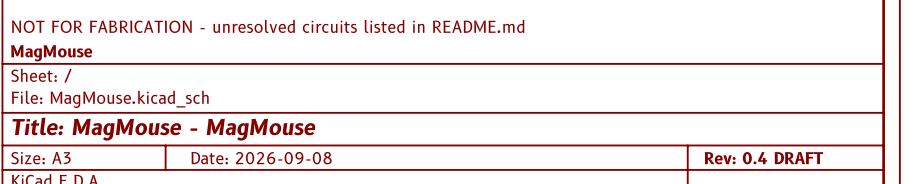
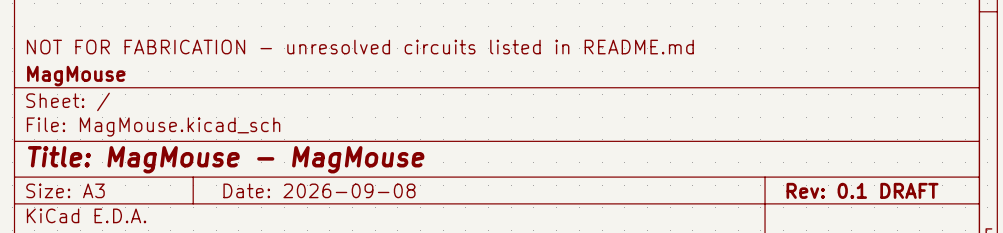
title block: Rev: 0.4 DRAFT (763, 158) -> Rev: 0.1 DRAFT (862, 190)

